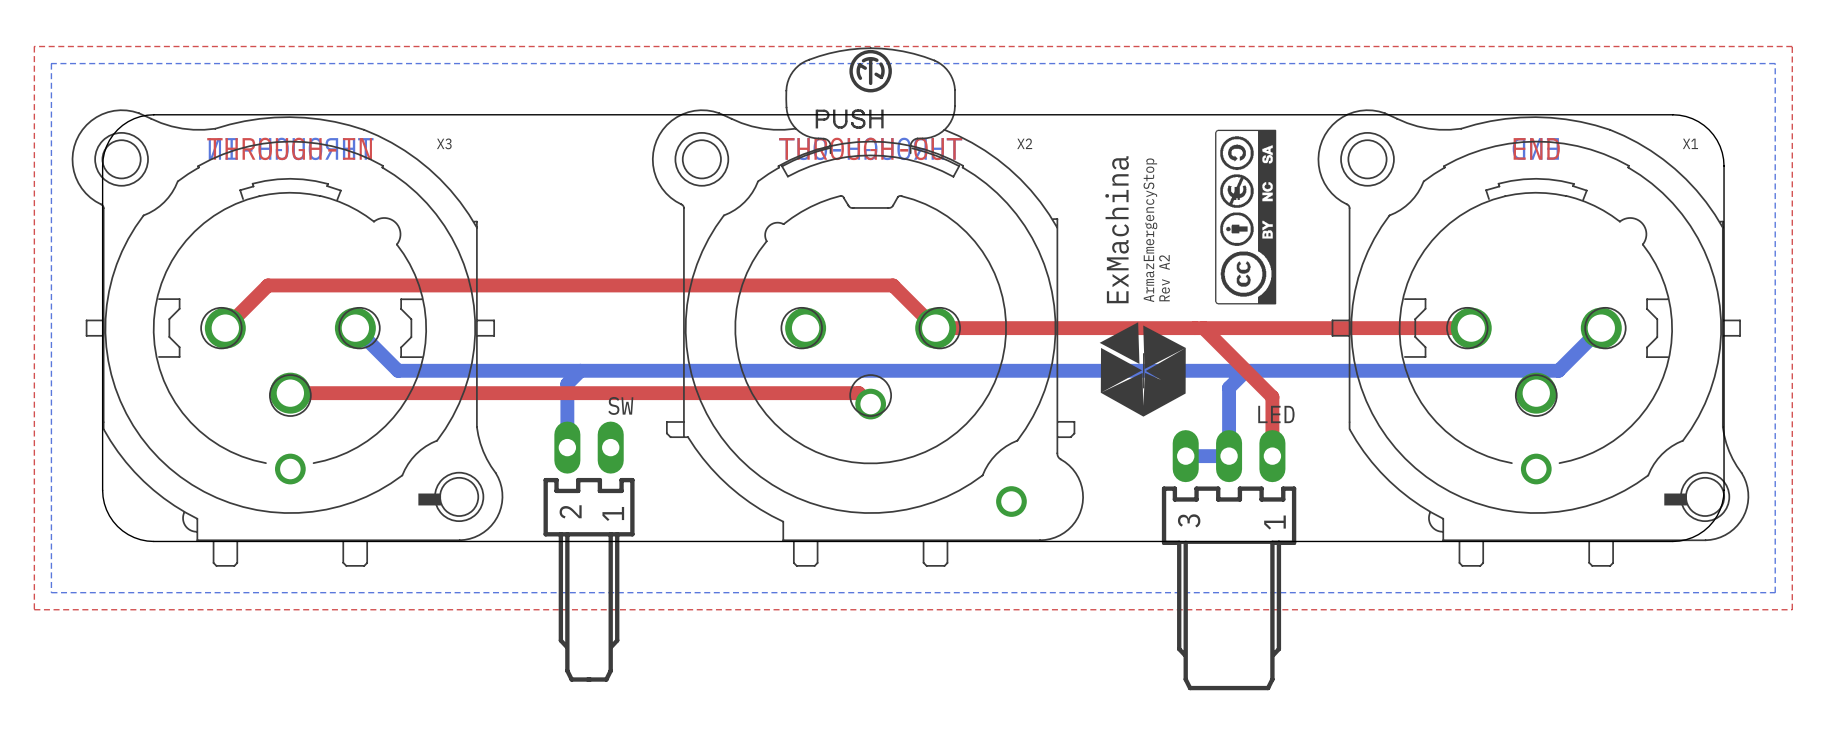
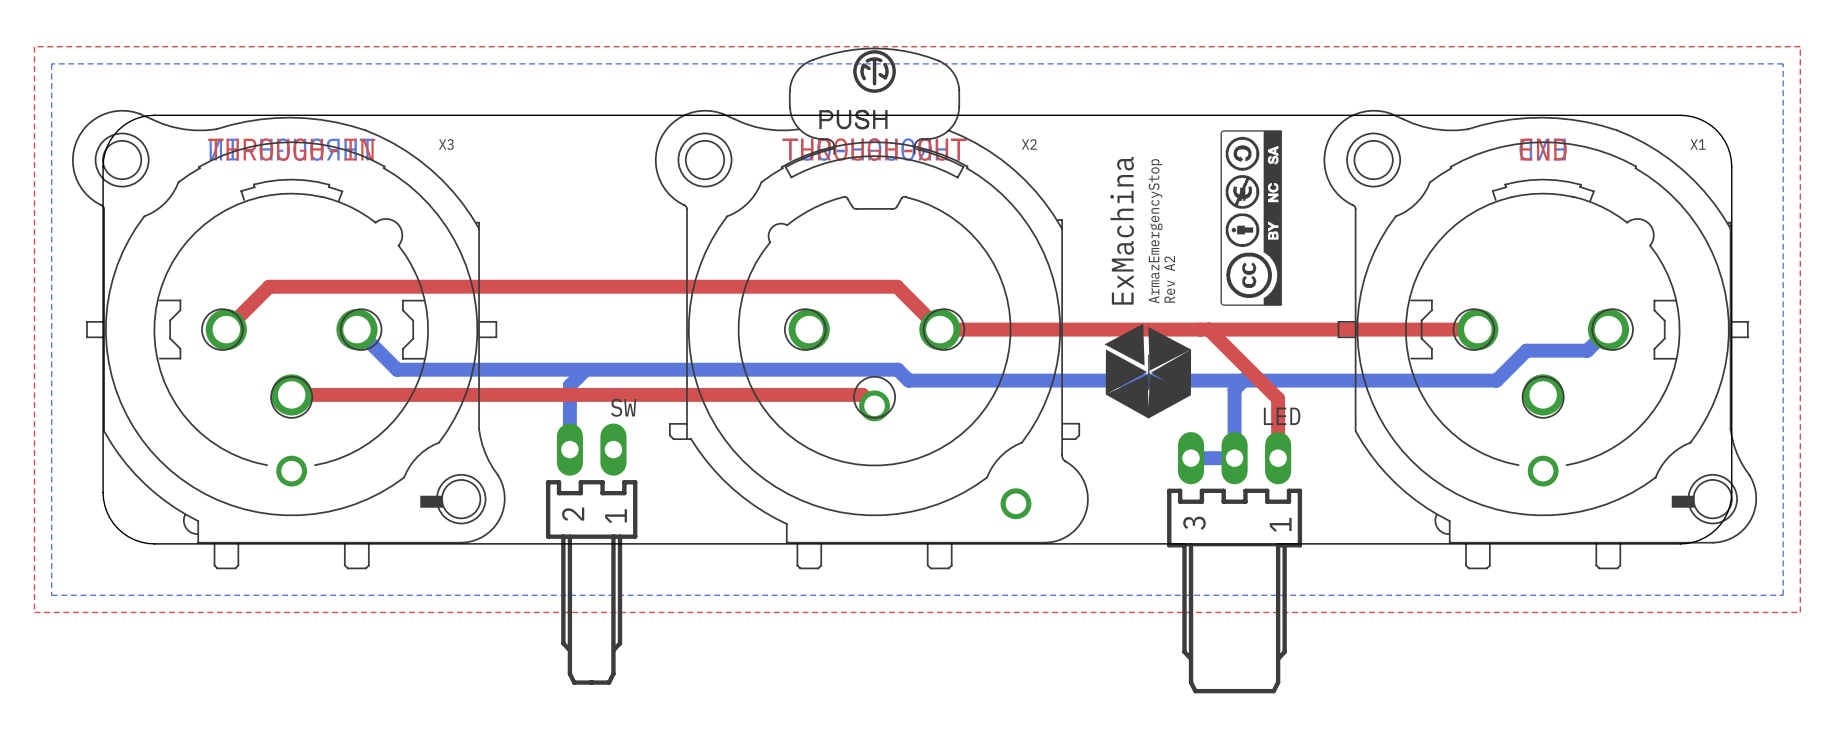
bottom track: (1580, 349) (1558, 370) (398, 370) (395, 368) -> (1587, 350) (1526, 350) (1496, 380) (908, 380) (897, 369) (397, 369)

